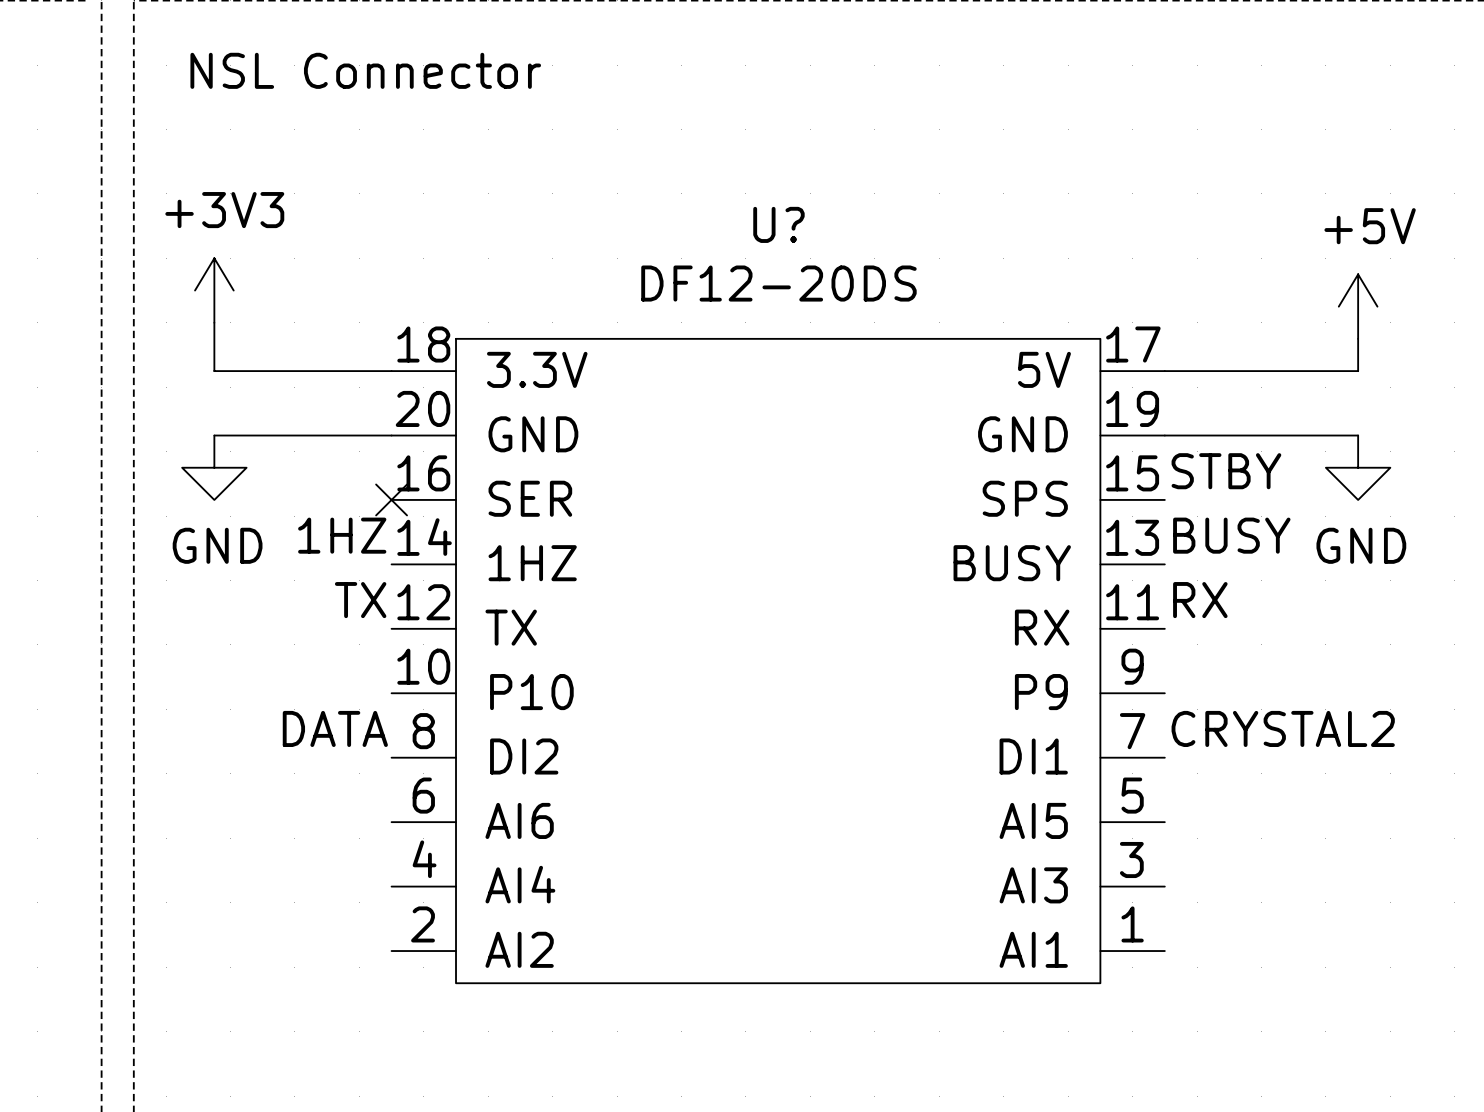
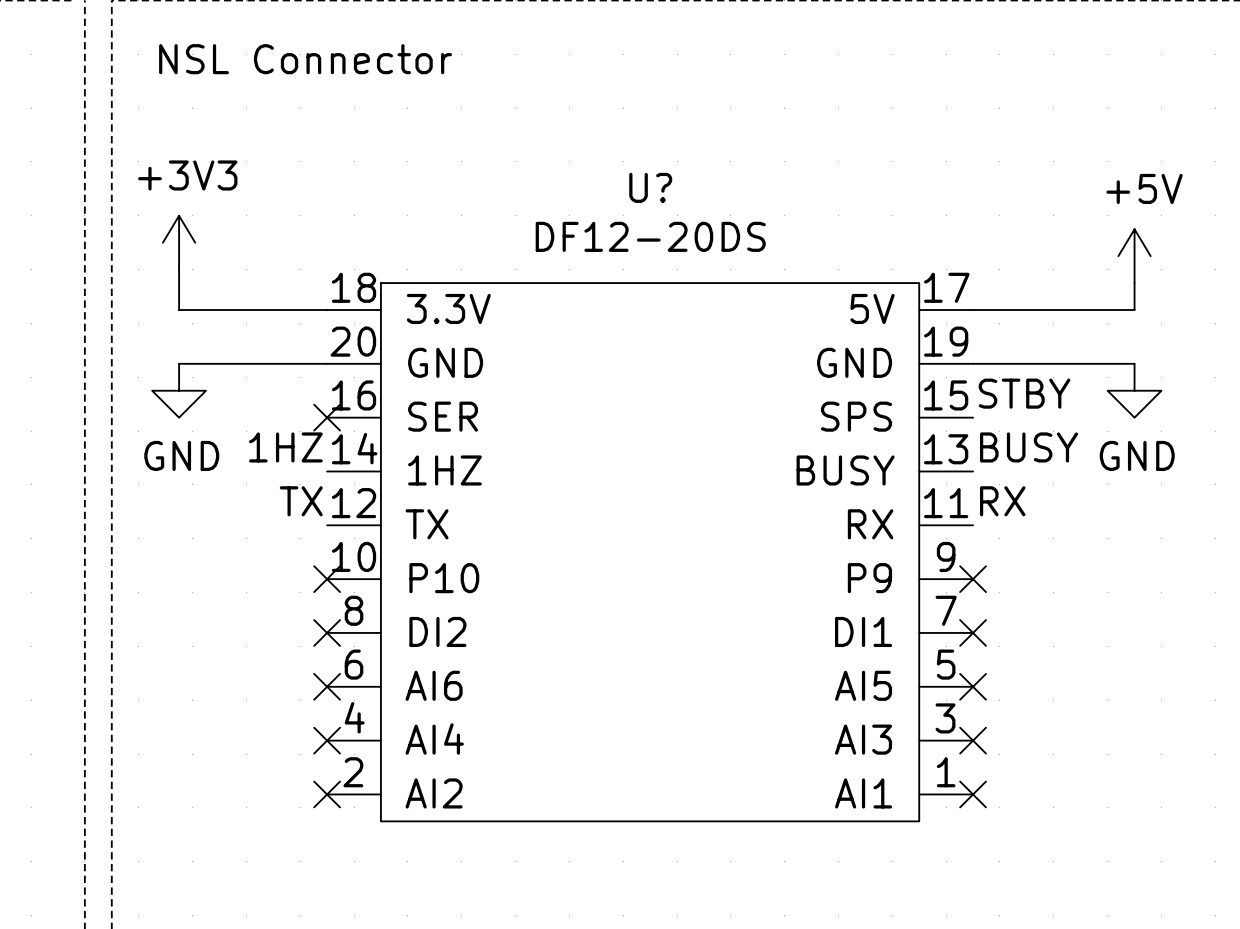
no-connect mark: none -> (327, 579)
no-connect mark: none -> (973, 579)
label: DATA (335, 728) -> none
label: CRYSTAL2 (1283, 728) -> none
no-connect mark: none -> (327, 632)
no-connect mark: none -> (973, 632)
no-connect mark: none -> (327, 686)
no-connect mark: none -> (973, 686)
no-connect mark: none -> (327, 740)
no-connect mark: none -> (973, 740)
no-connect mark: none -> (327, 794)
no-connect mark: none -> (973, 794)

